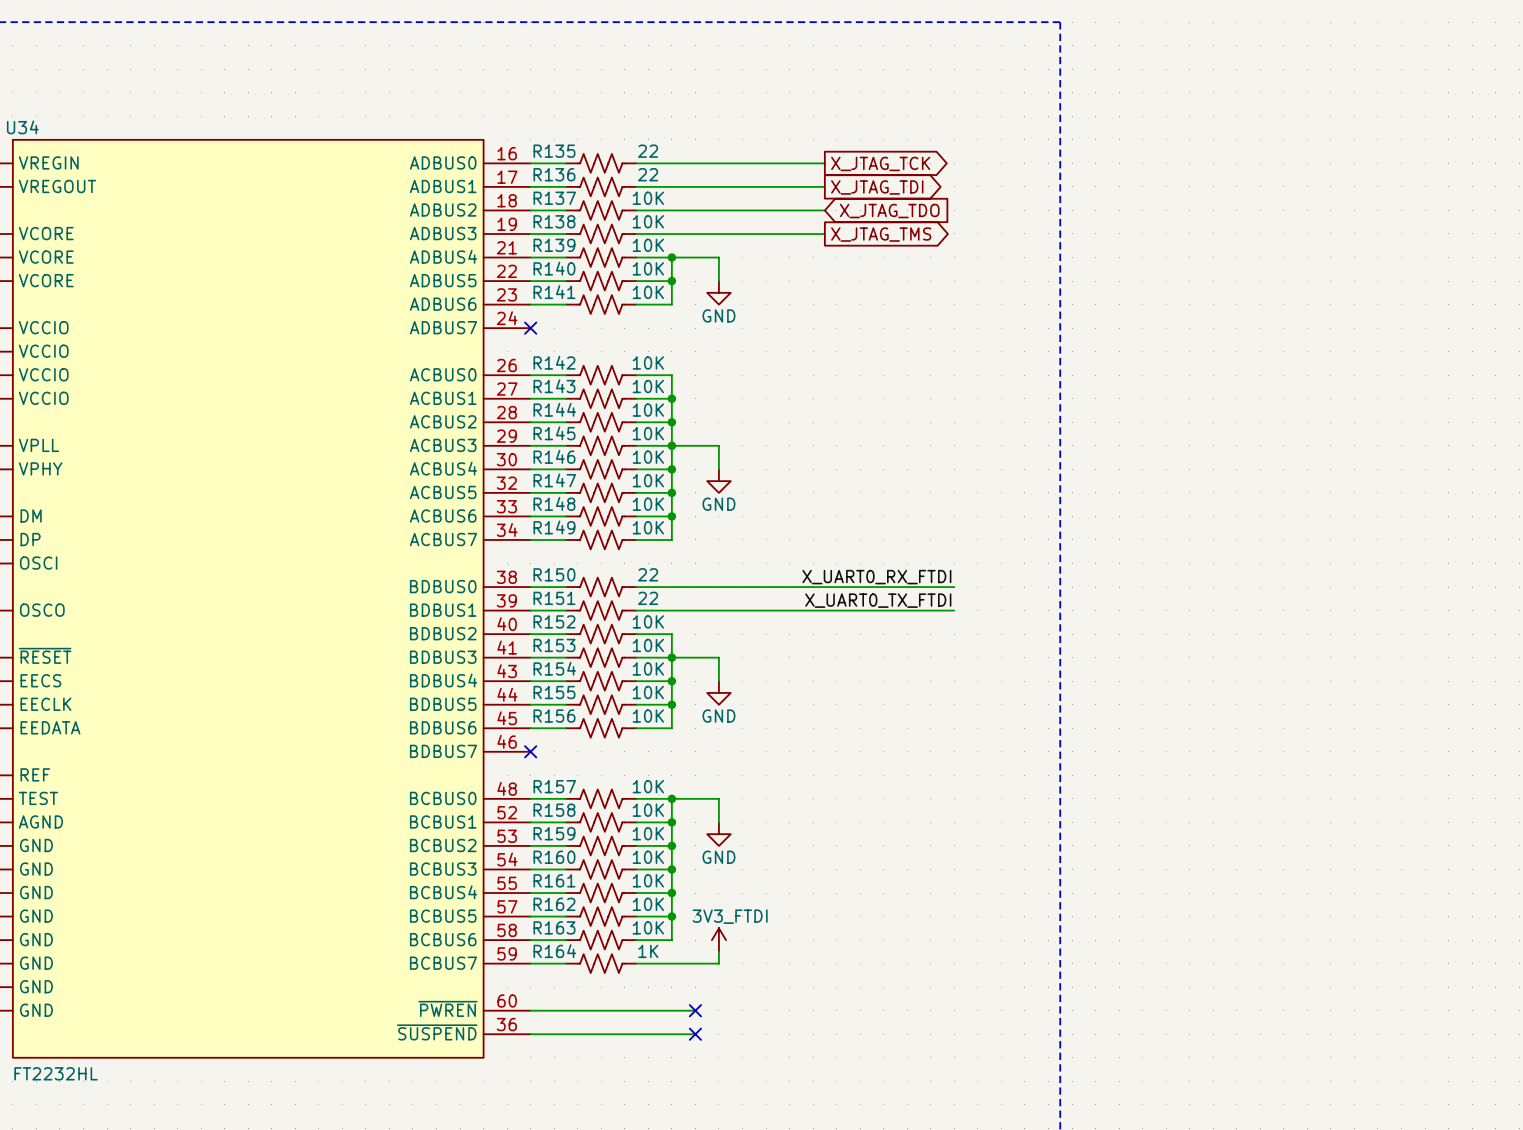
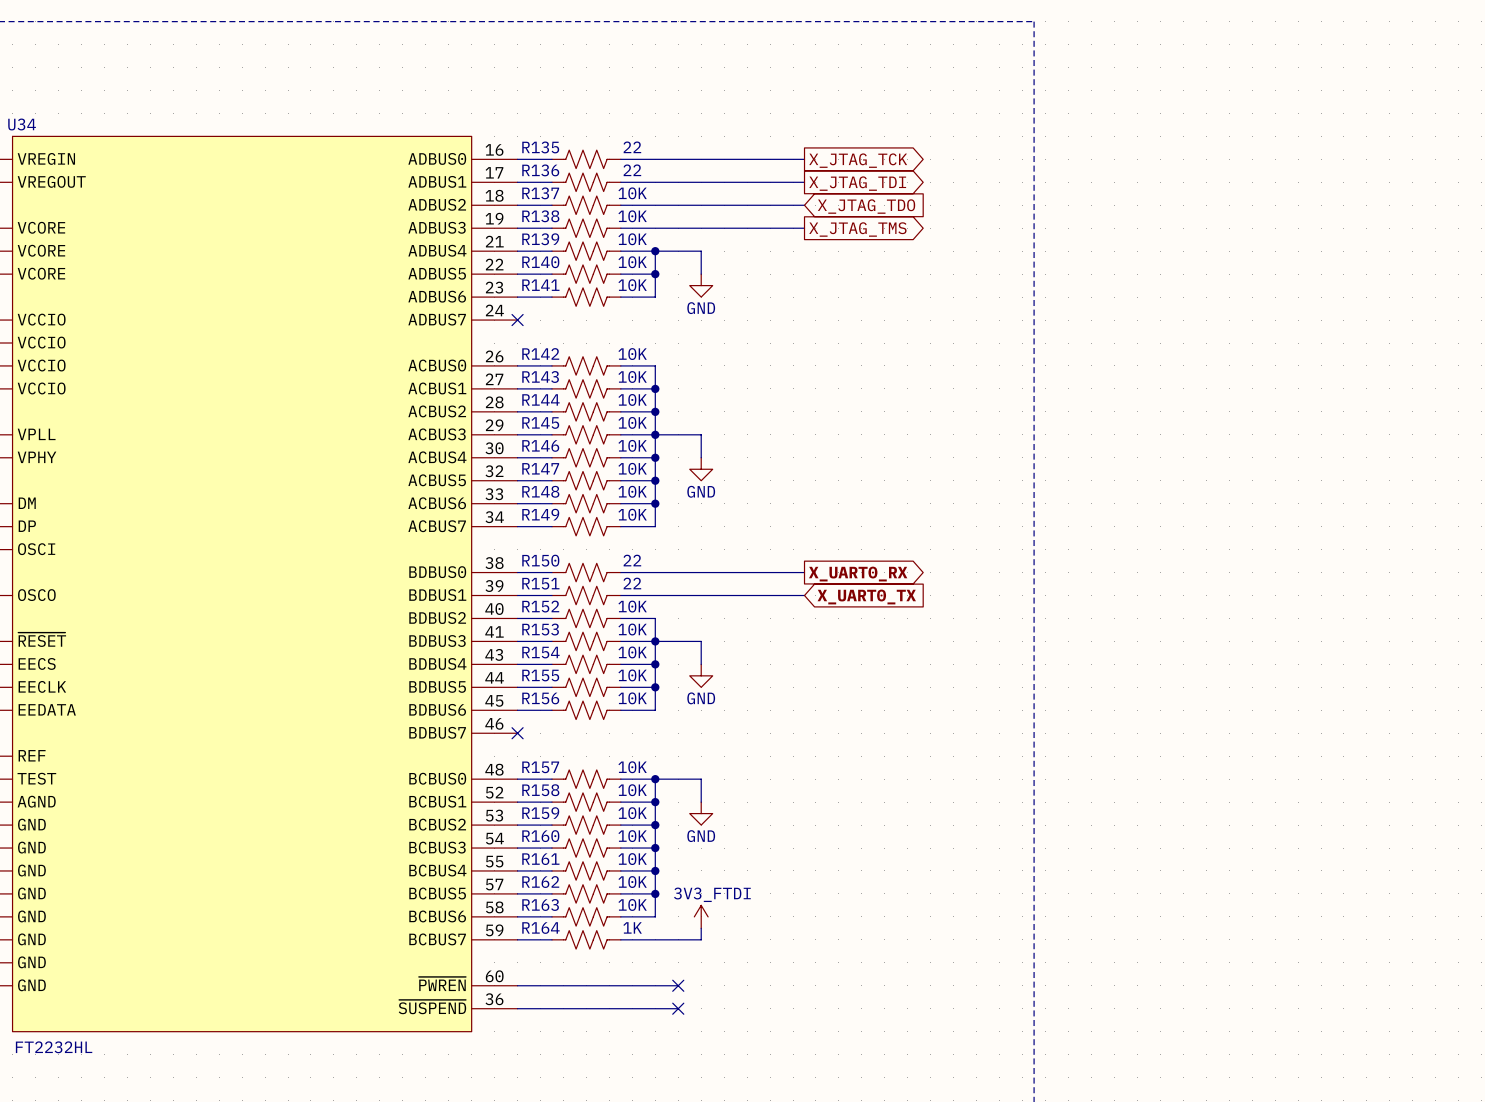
label: X_UART0_RX_FTDI (876, 577) -> none
wire: (824, 587) (954, 587) -> none
global label: none -> X_UART0_RX (858, 574)
label: X_UART0_TX_FTDI (878, 600) -> none
wire: (824, 610) (954, 610) -> none
global label: none -> X_UART0_TX (866, 596)

